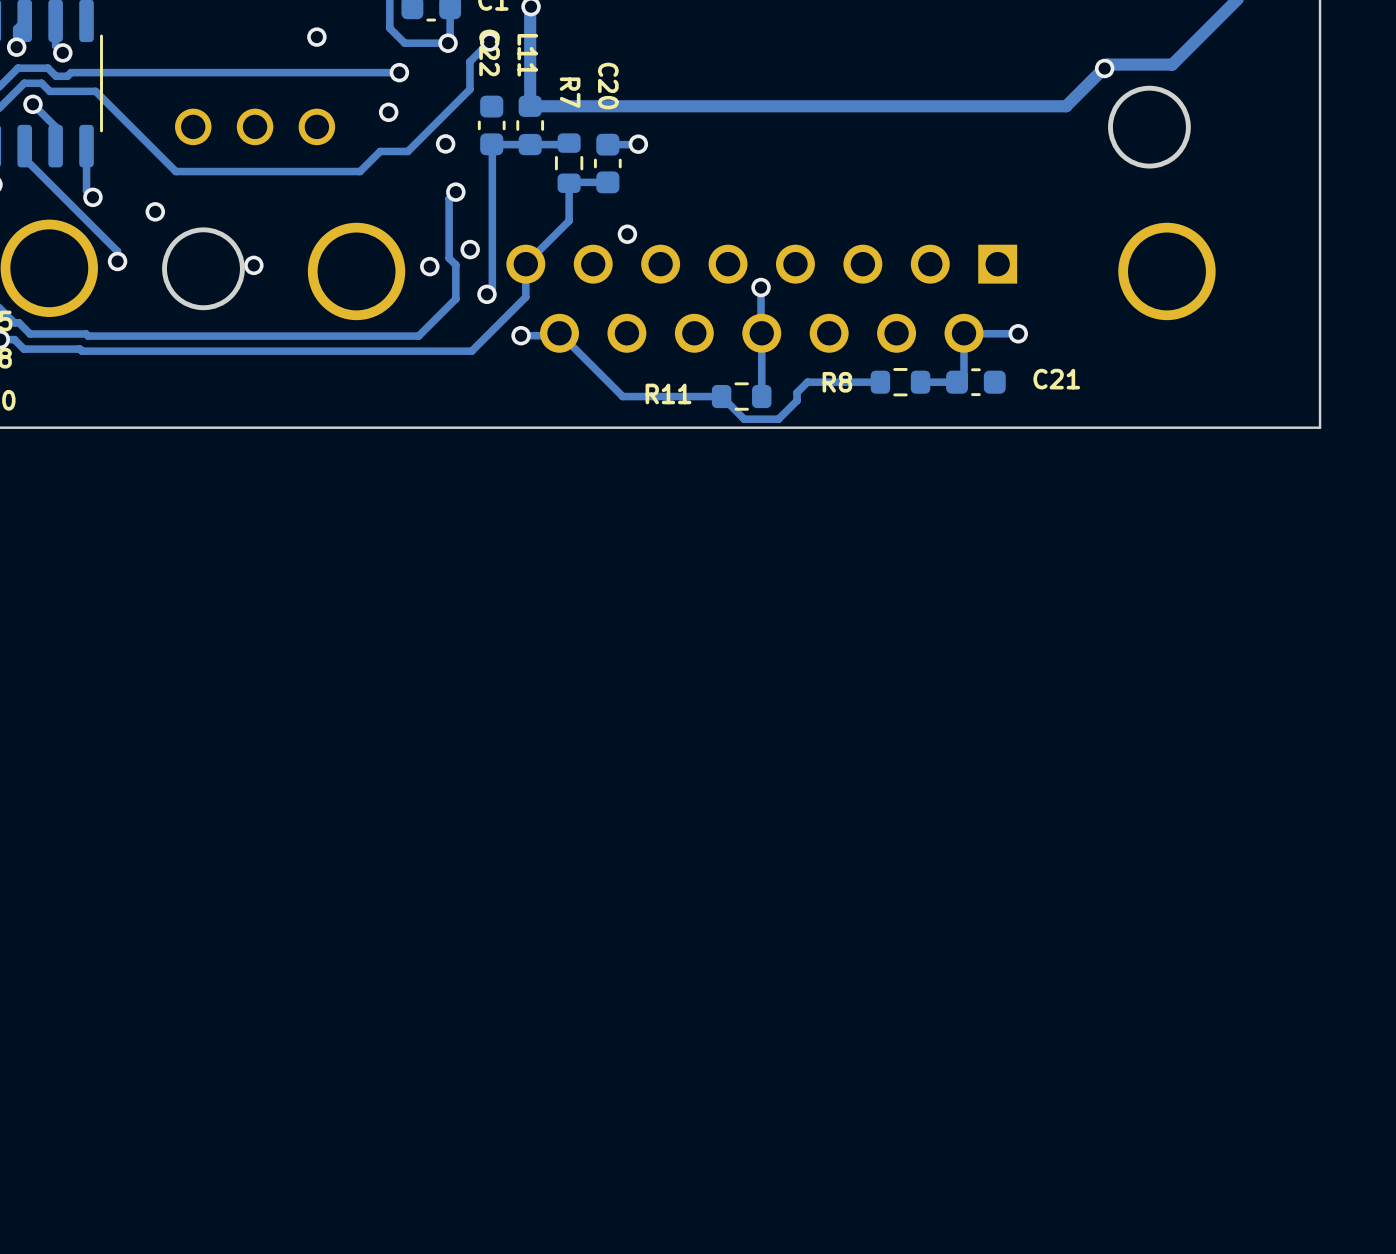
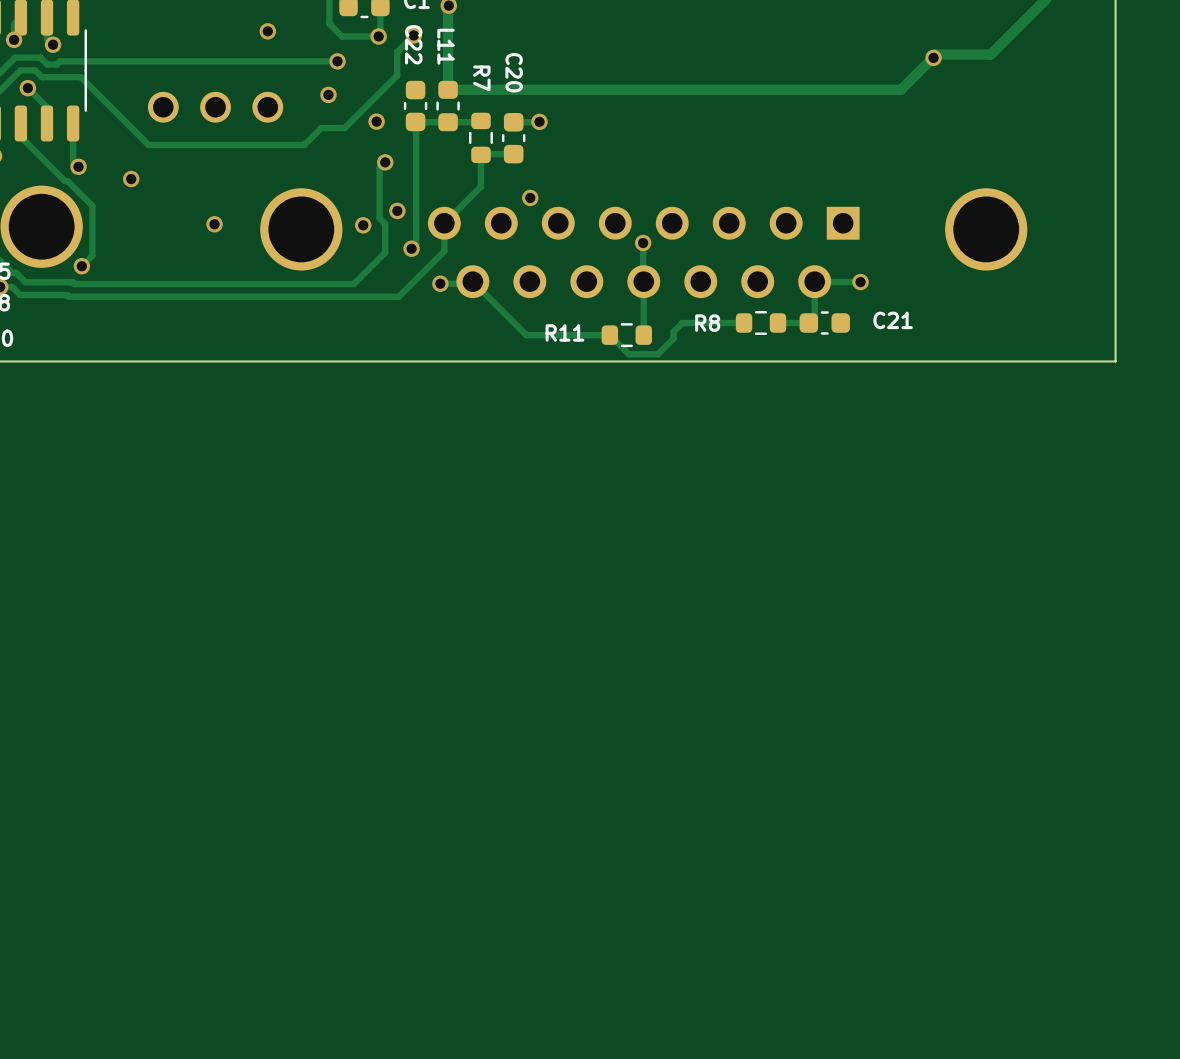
round board edge: [1108, 85, 1191, 169] -> none
track: (24, 158) (117, 251) (117, 261) -> (20, 134) (20, 136) (92, 205) (92, 255) (81, 266)
round board edge: [162, 227, 245, 311] -> none
via position: (117, 261) -> (81, 266)

